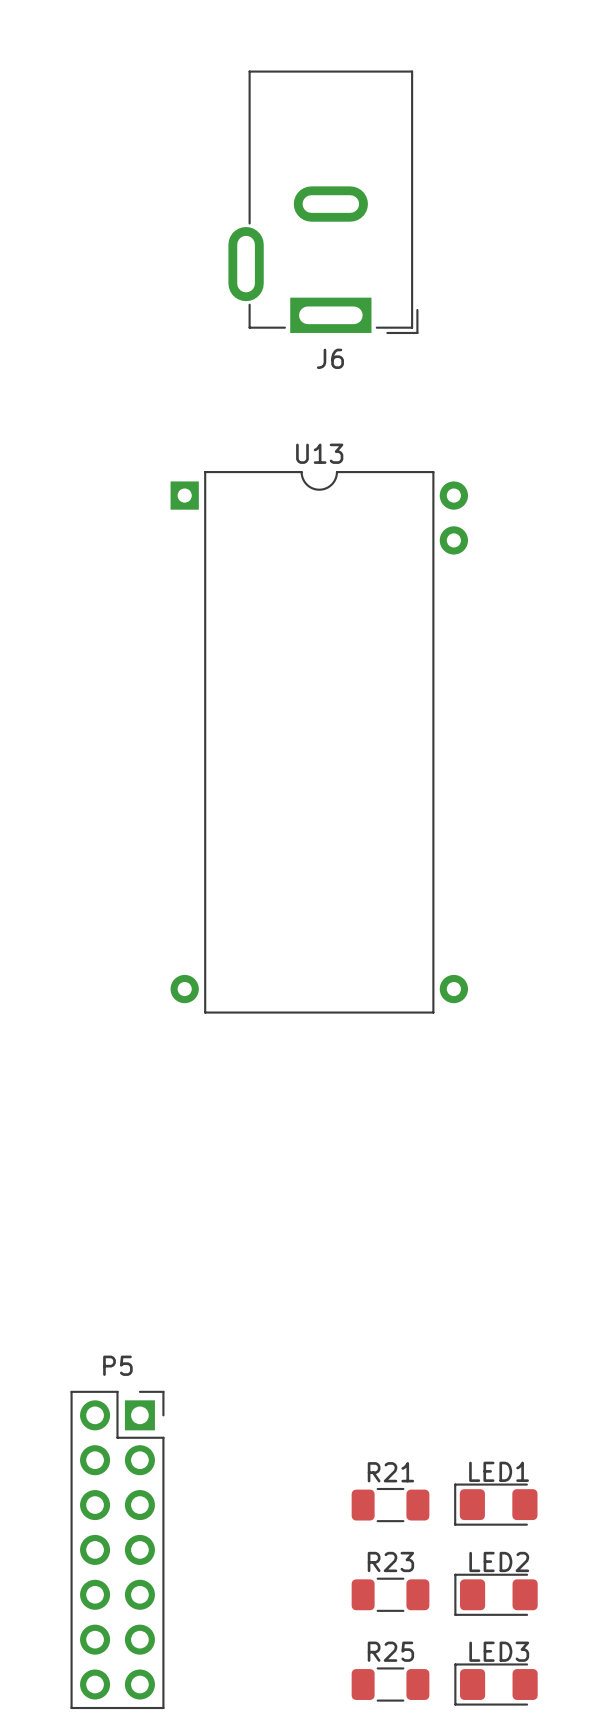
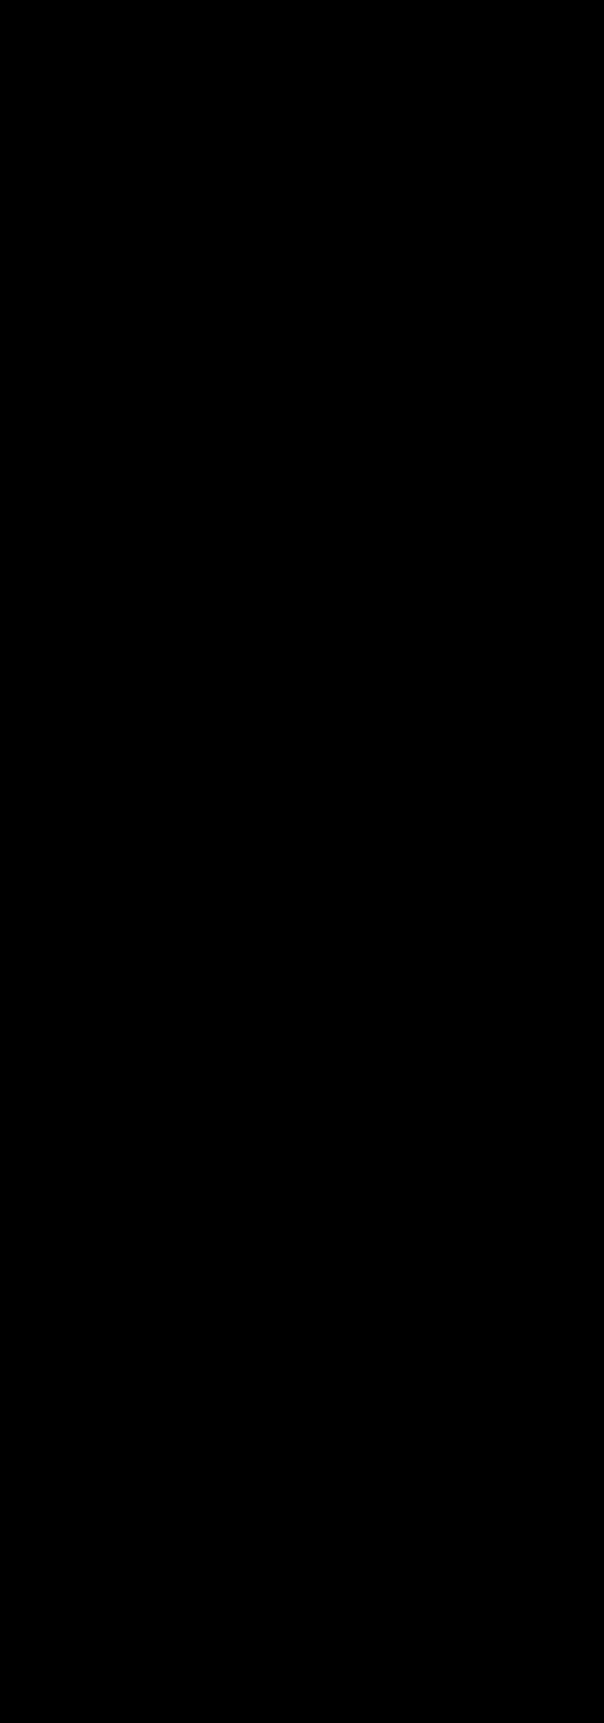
J6: (323, 202) -> none
U13: (319, 742) -> none
LED1: (495, 1504) -> none
R21: (390, 1505) -> none
P5: (117, 1549) -> none
R23: (390, 1594) -> none
LED2: (496, 1594) -> none
R25: (390, 1684) -> none
LED3: (496, 1684) -> none

